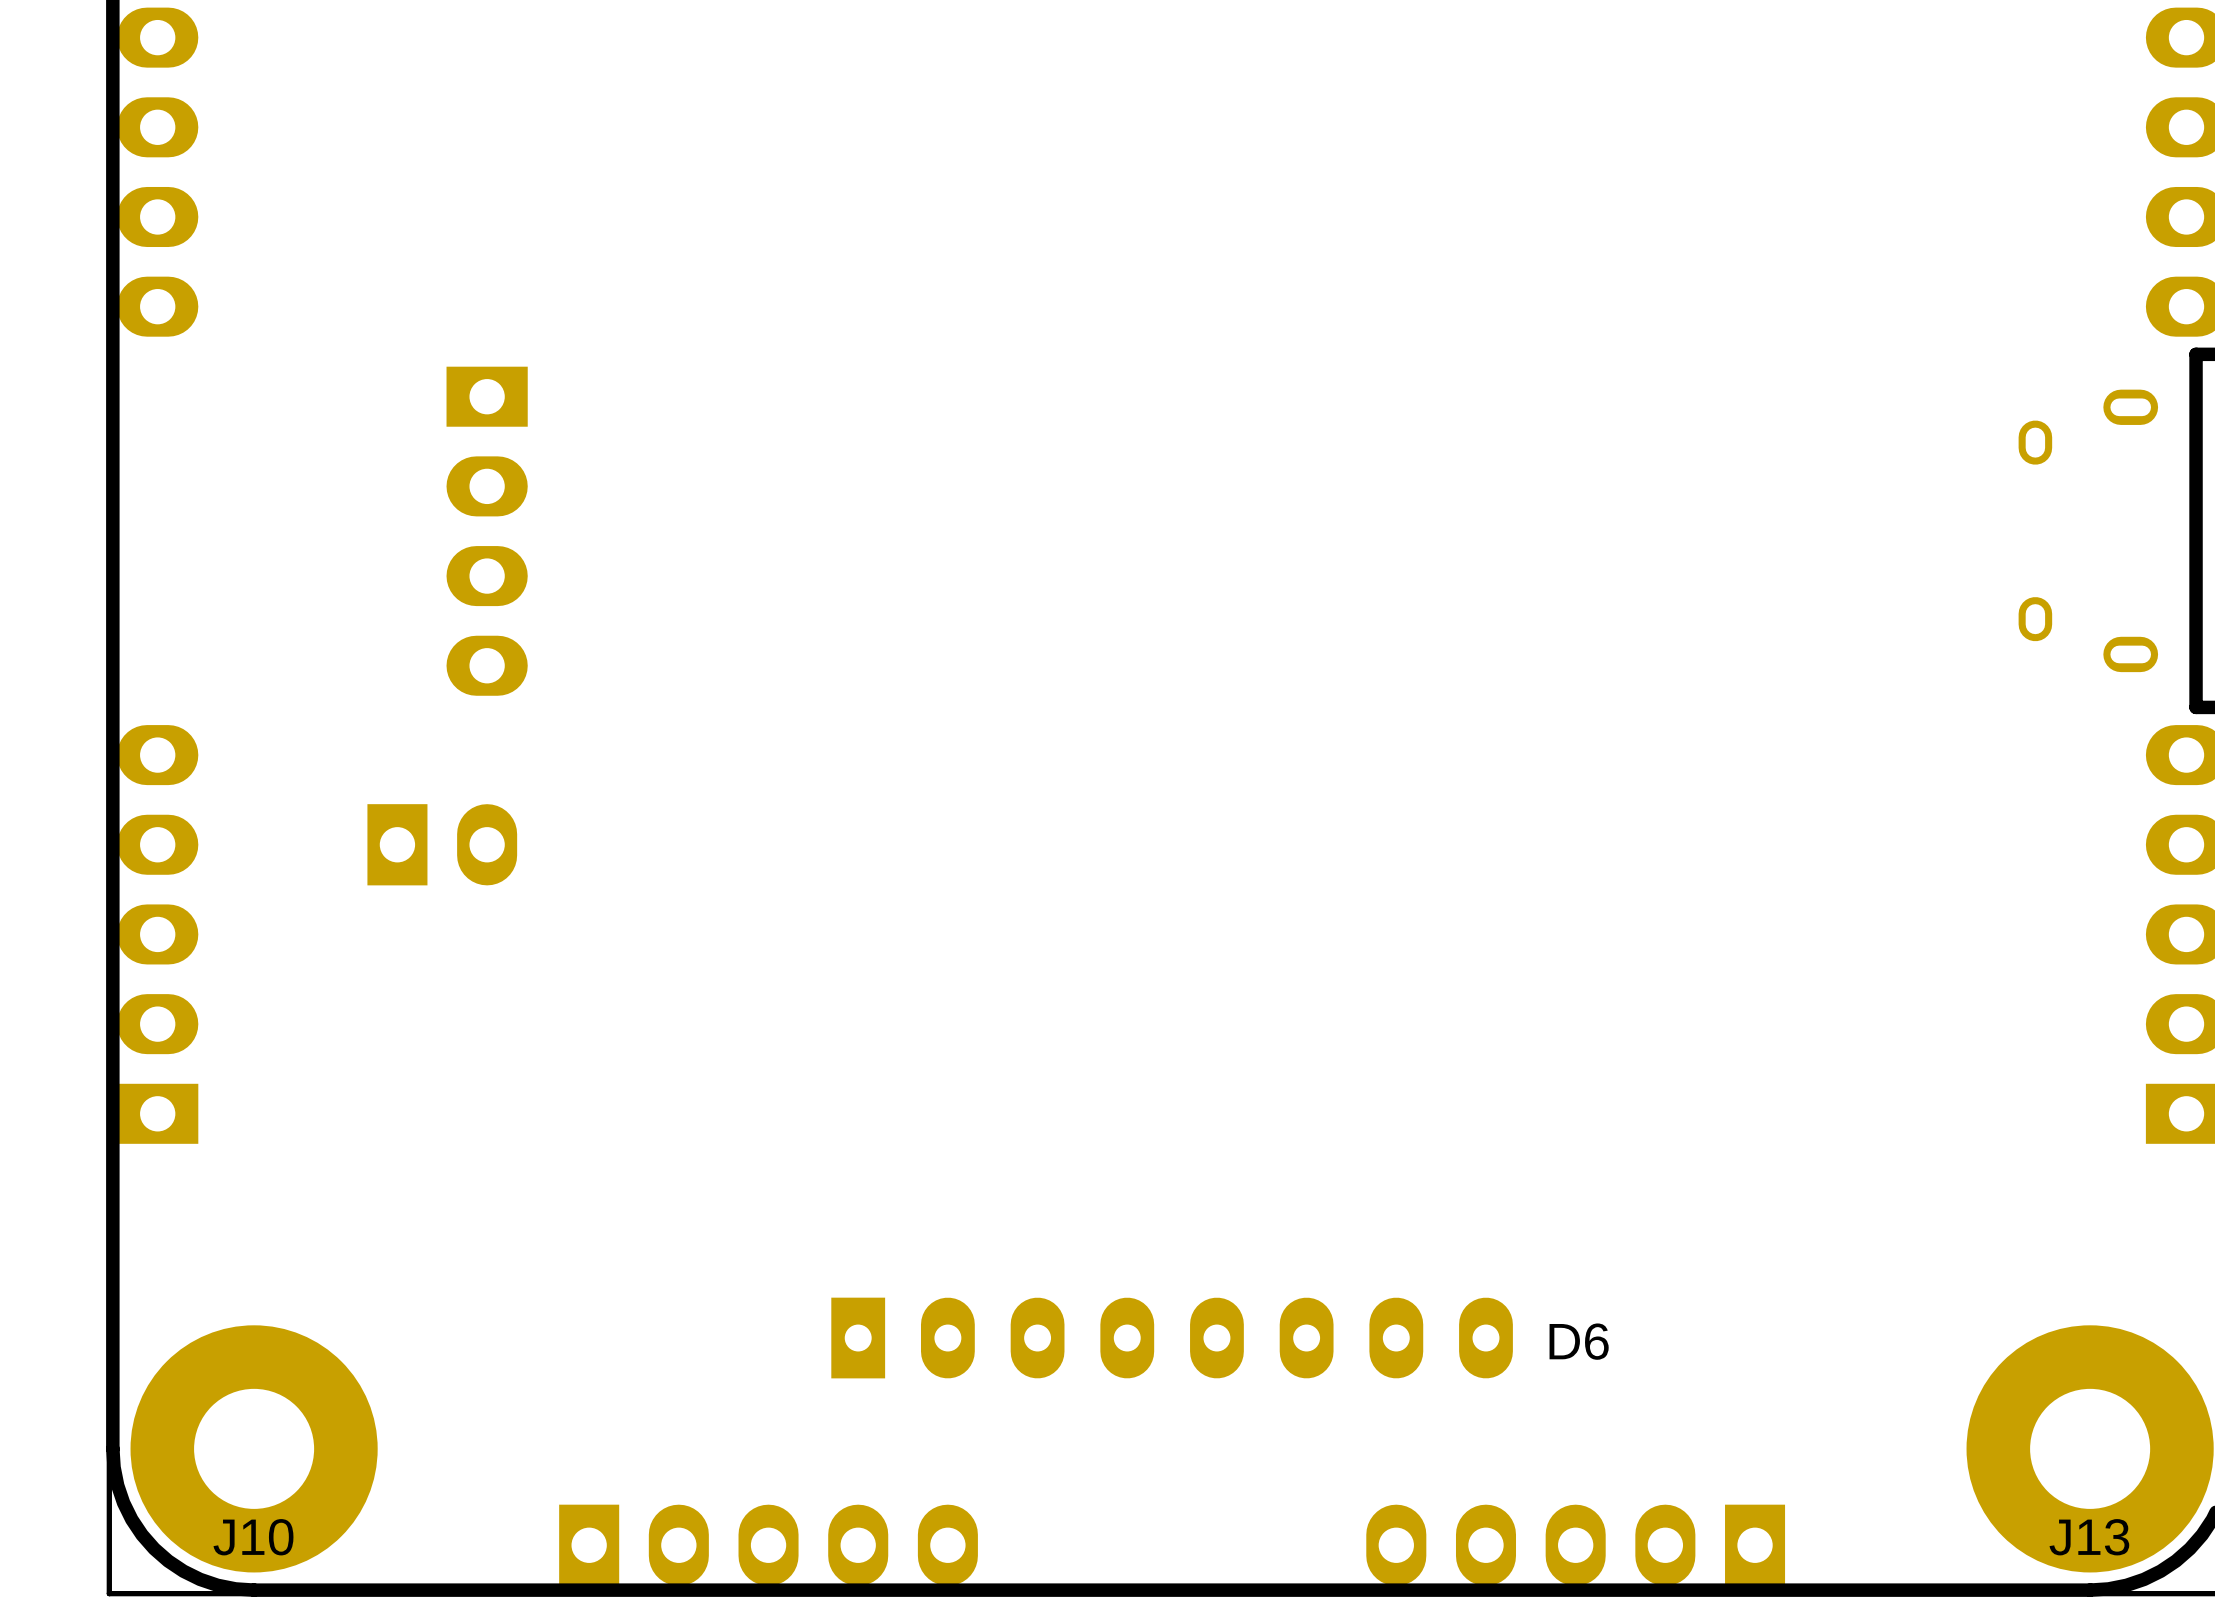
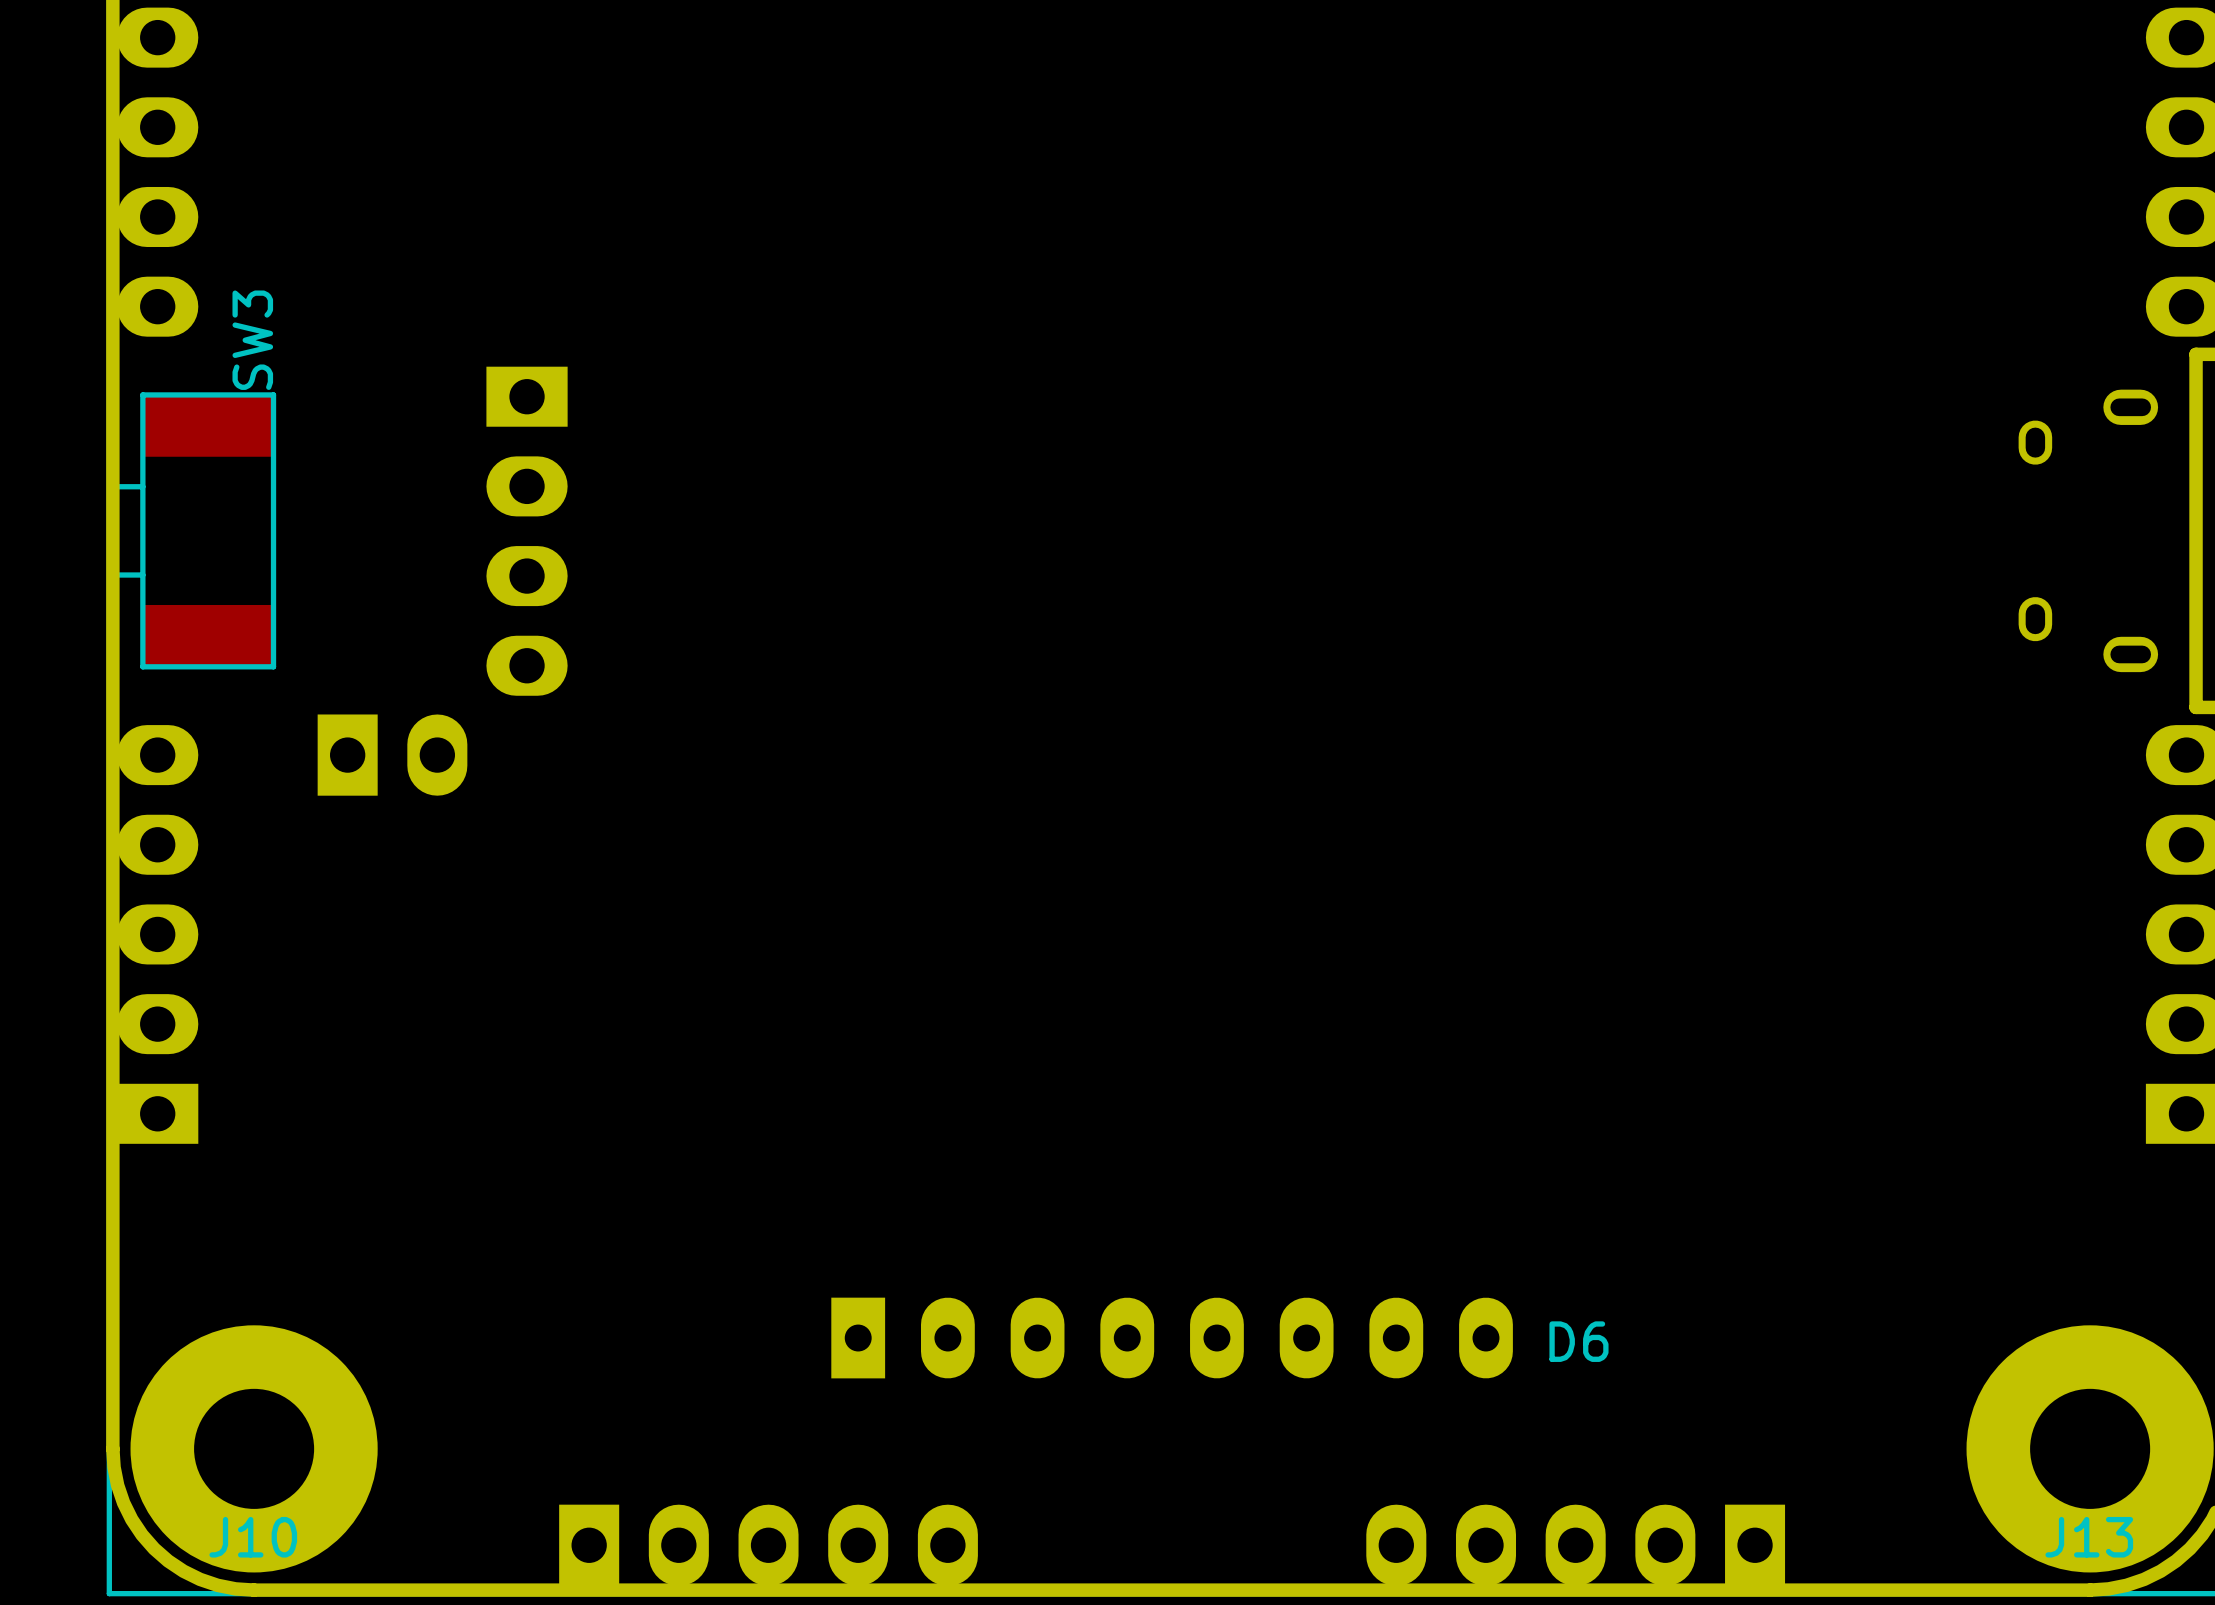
SW3: none -> (194, 530)
part position: (487, 531) -> (527, 531)
part position: (442, 844) -> (392, 755)

